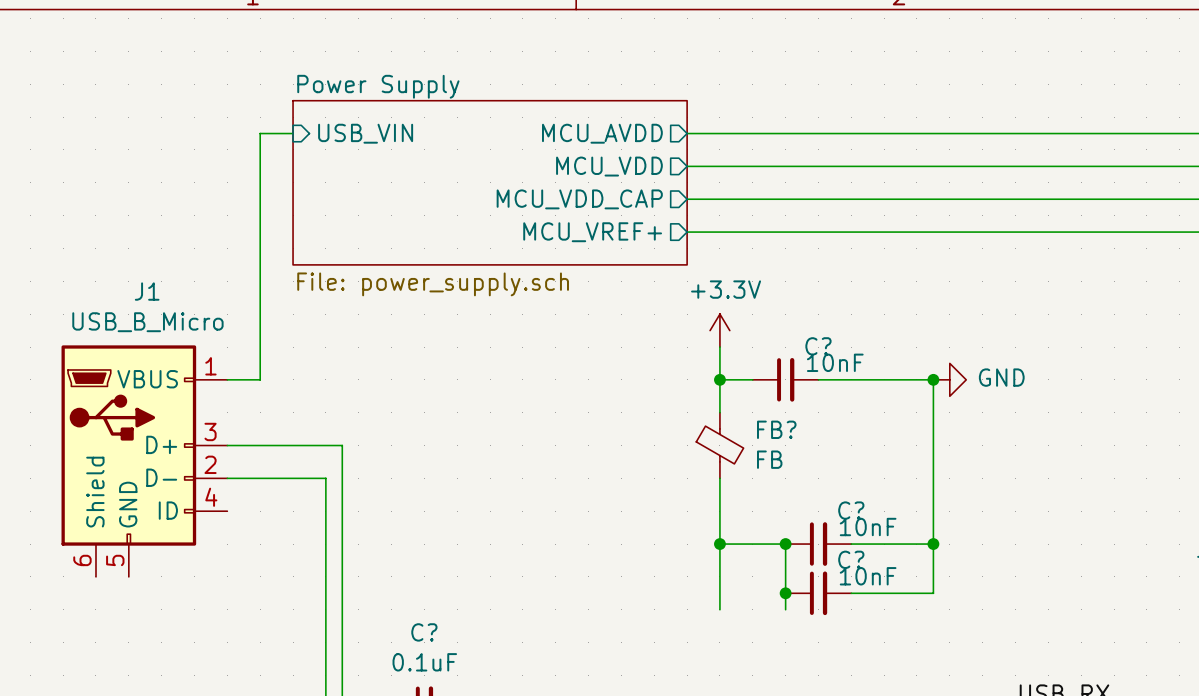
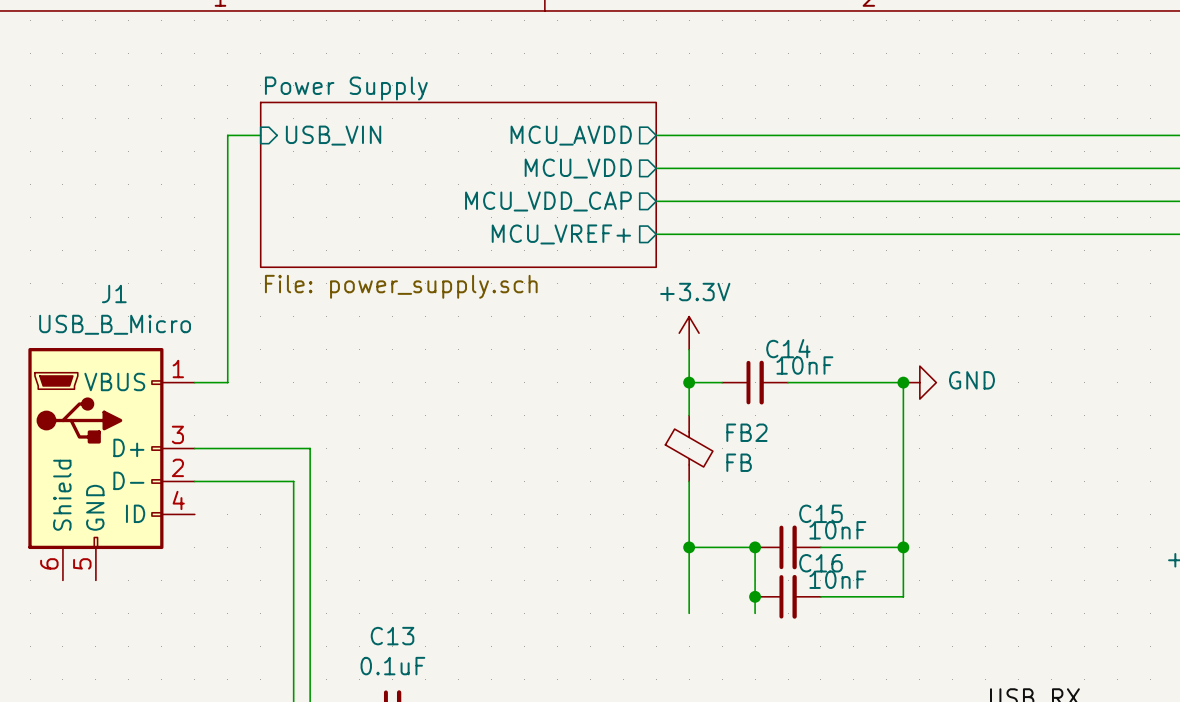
C? name: C? (818, 346) -> C14 (788, 348)
FB? name: FB? (776, 429) -> FB2 (746, 432)
C? name: C? (851, 510) -> C15 (820, 513)
C? name: C? (851, 559) -> C16 (820, 563)
C? name: C? (424, 632) -> C13 (392, 636)

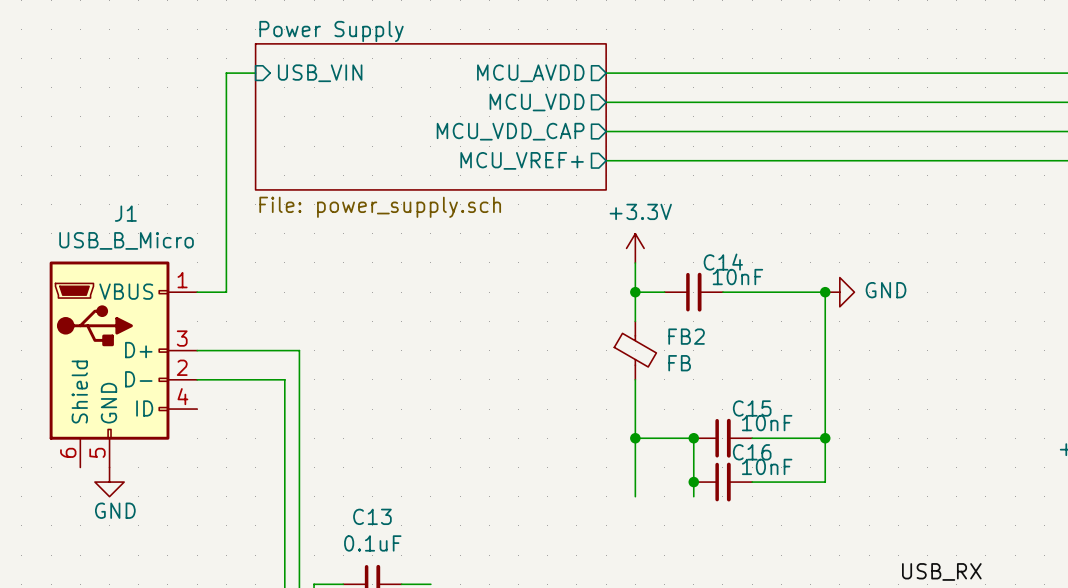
power symbol: none -> GND (109, 482)

